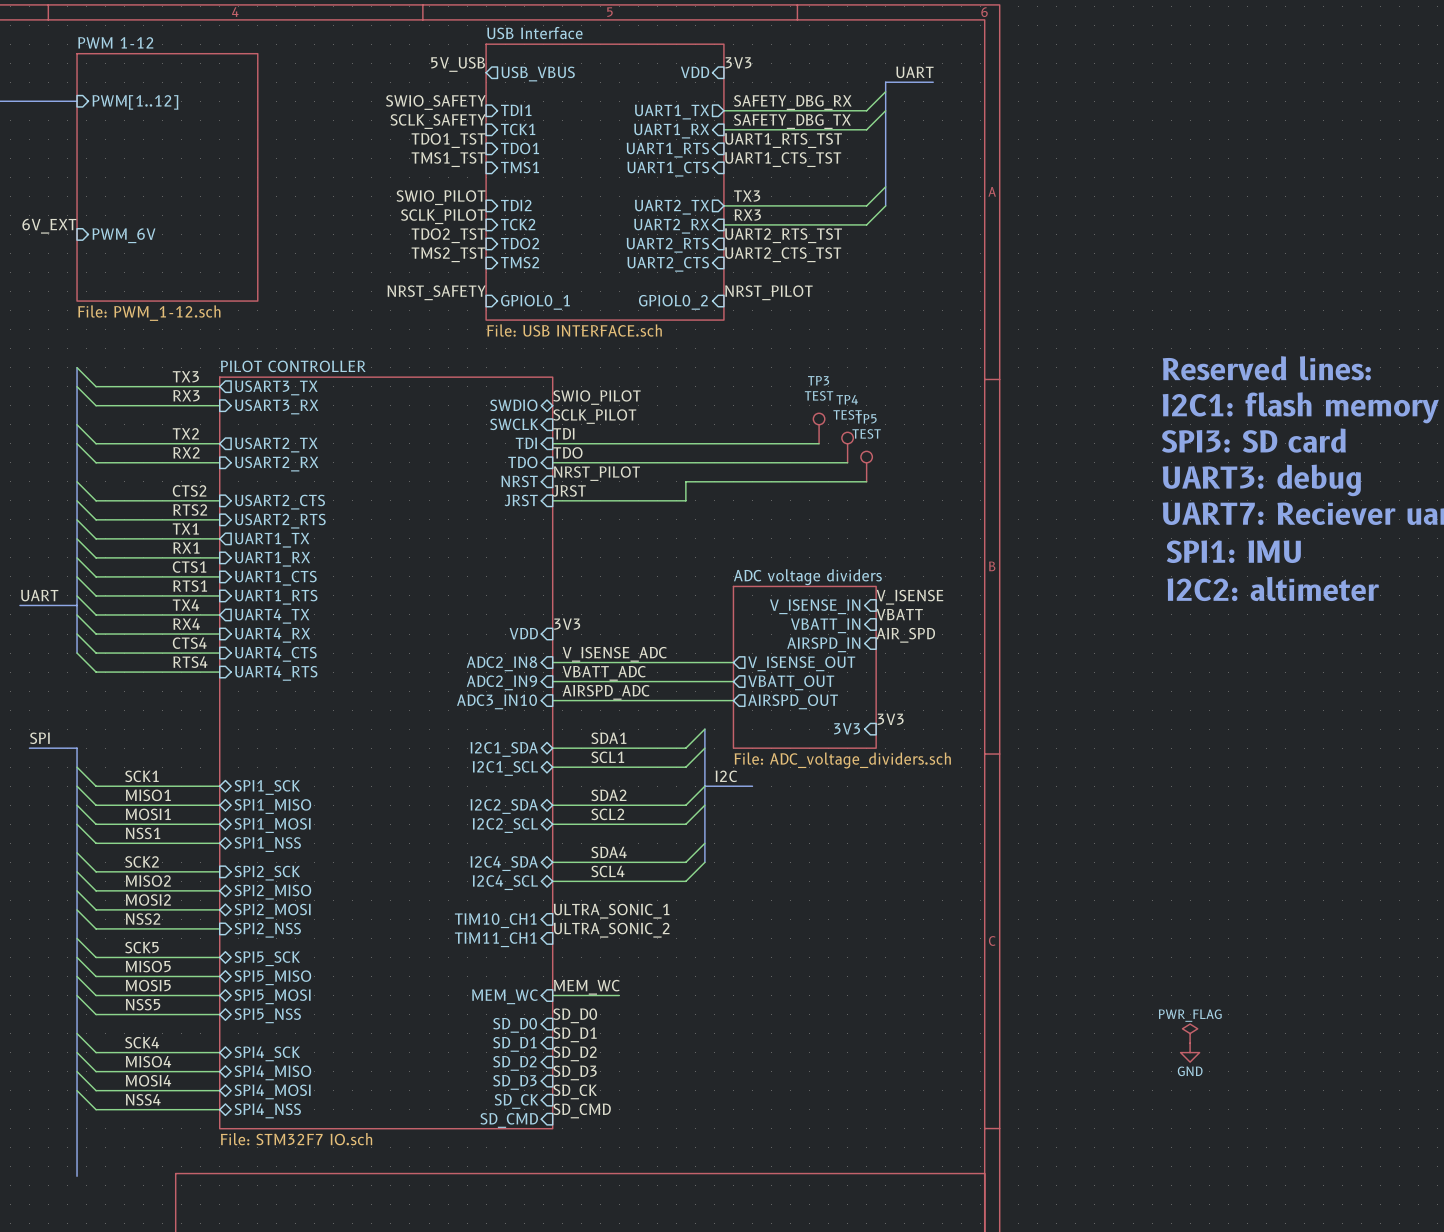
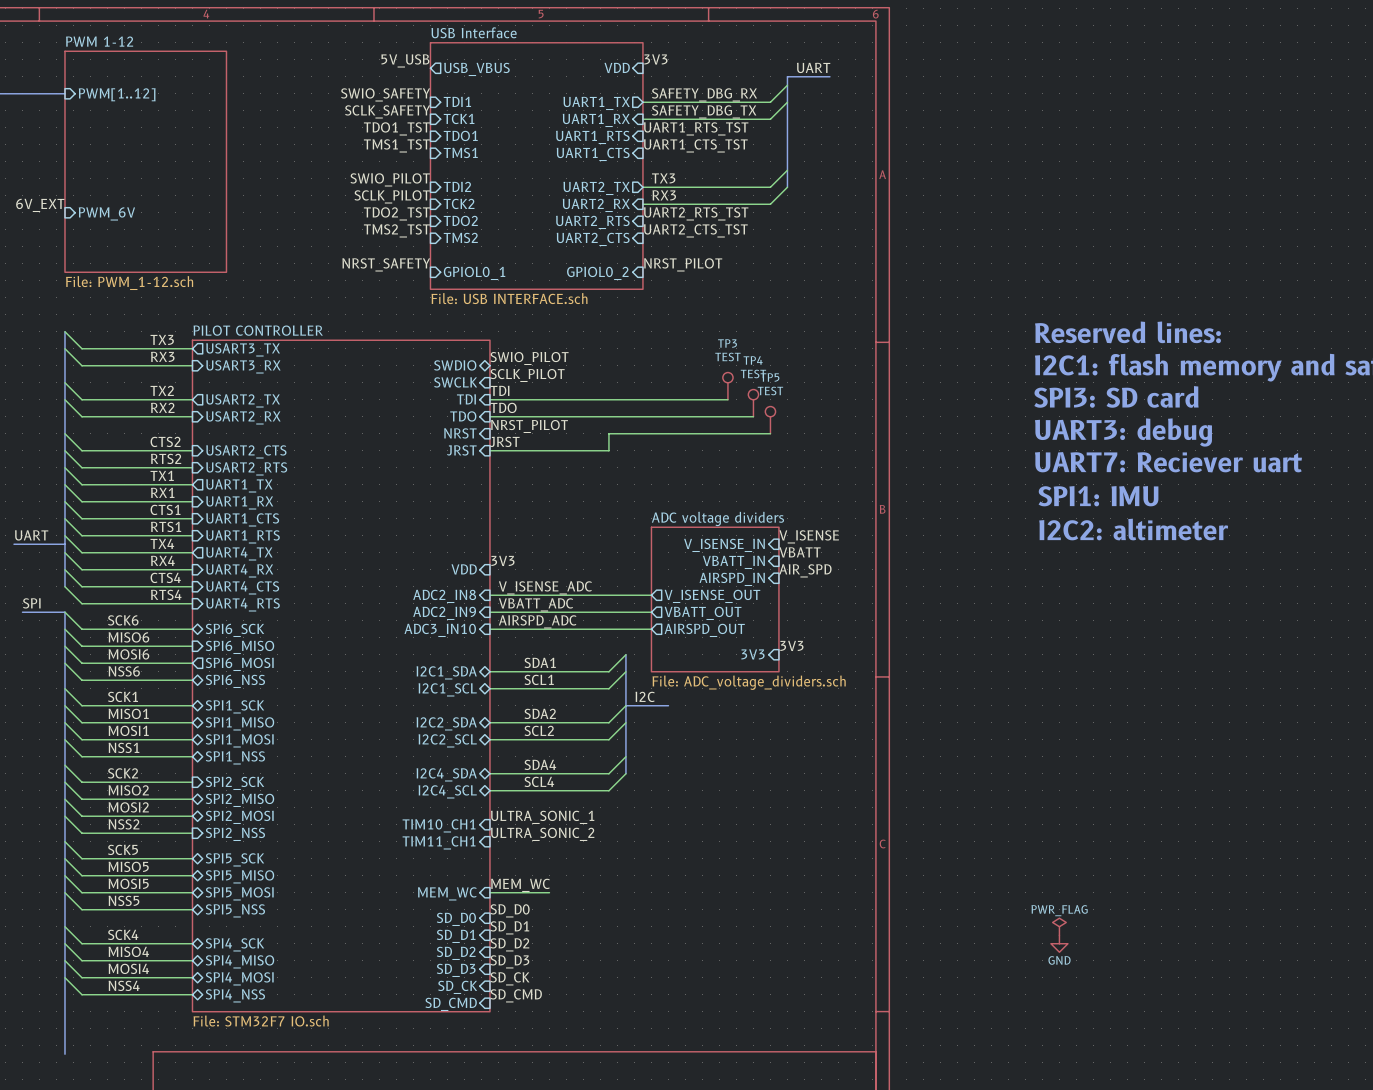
wire: none -> (64, 612) (81, 629) (192, 629)
label: none -> SCK6 (123, 620)
wire: none -> (64, 629) (81, 646) (192, 646)
sheet pin: none -> SPI6_SCK (234, 630)
label: none -> MISO6 (128, 637)
wire: none -> (64, 646) (81, 663) (192, 663)
sheet pin: none -> SPI6_MISO (239, 647)
label: none -> MOSI6 (128, 654)
label position: SPI (39, 738) -> SPI (31, 603)
wire: none -> (64, 663) (81, 680) (192, 680)
sheet pin: none -> SPI6_MOSI (239, 664)
label: none -> NSS6 (124, 671)
bus: (29, 748) (77, 748) -> (22, 612) (64, 612) (64, 671)
sheet pin: none -> SPI6_NSS (235, 681)

